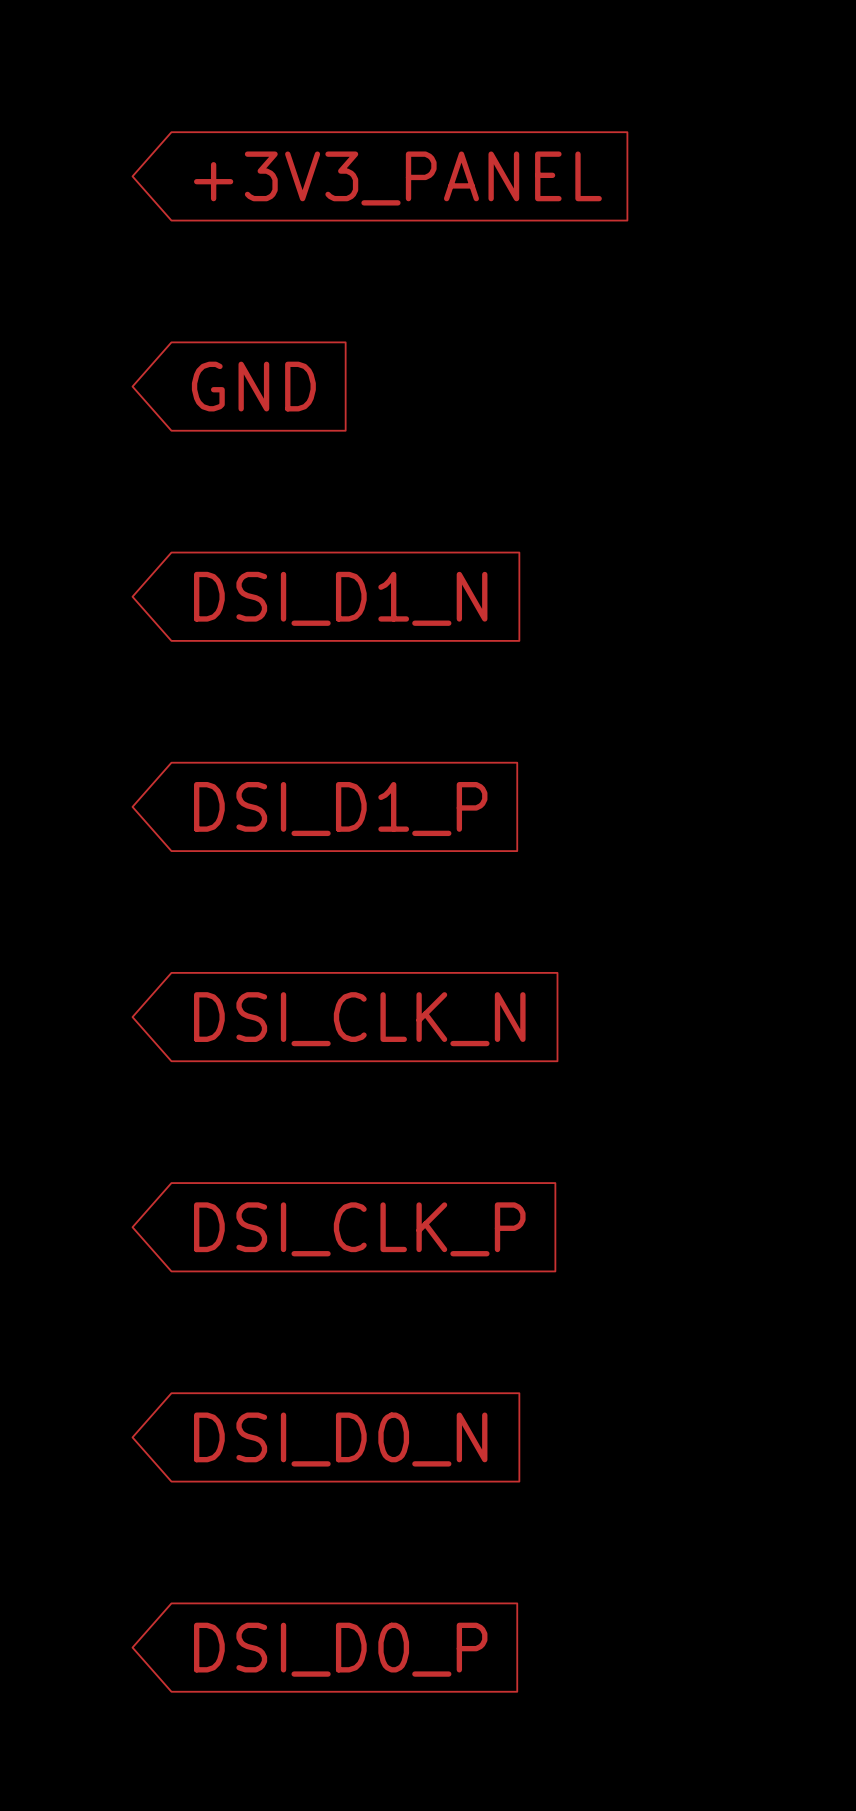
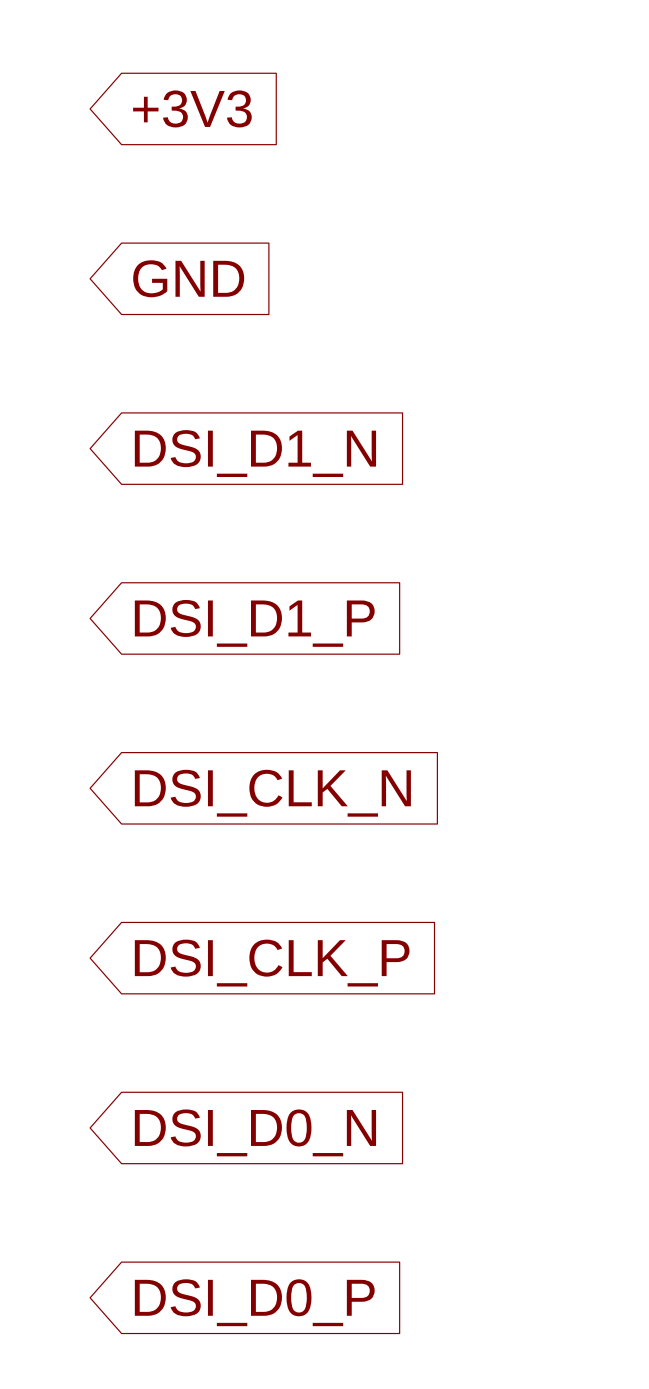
global label: +3V3_PANEL (397, 178) -> +3V3 (192, 108)

